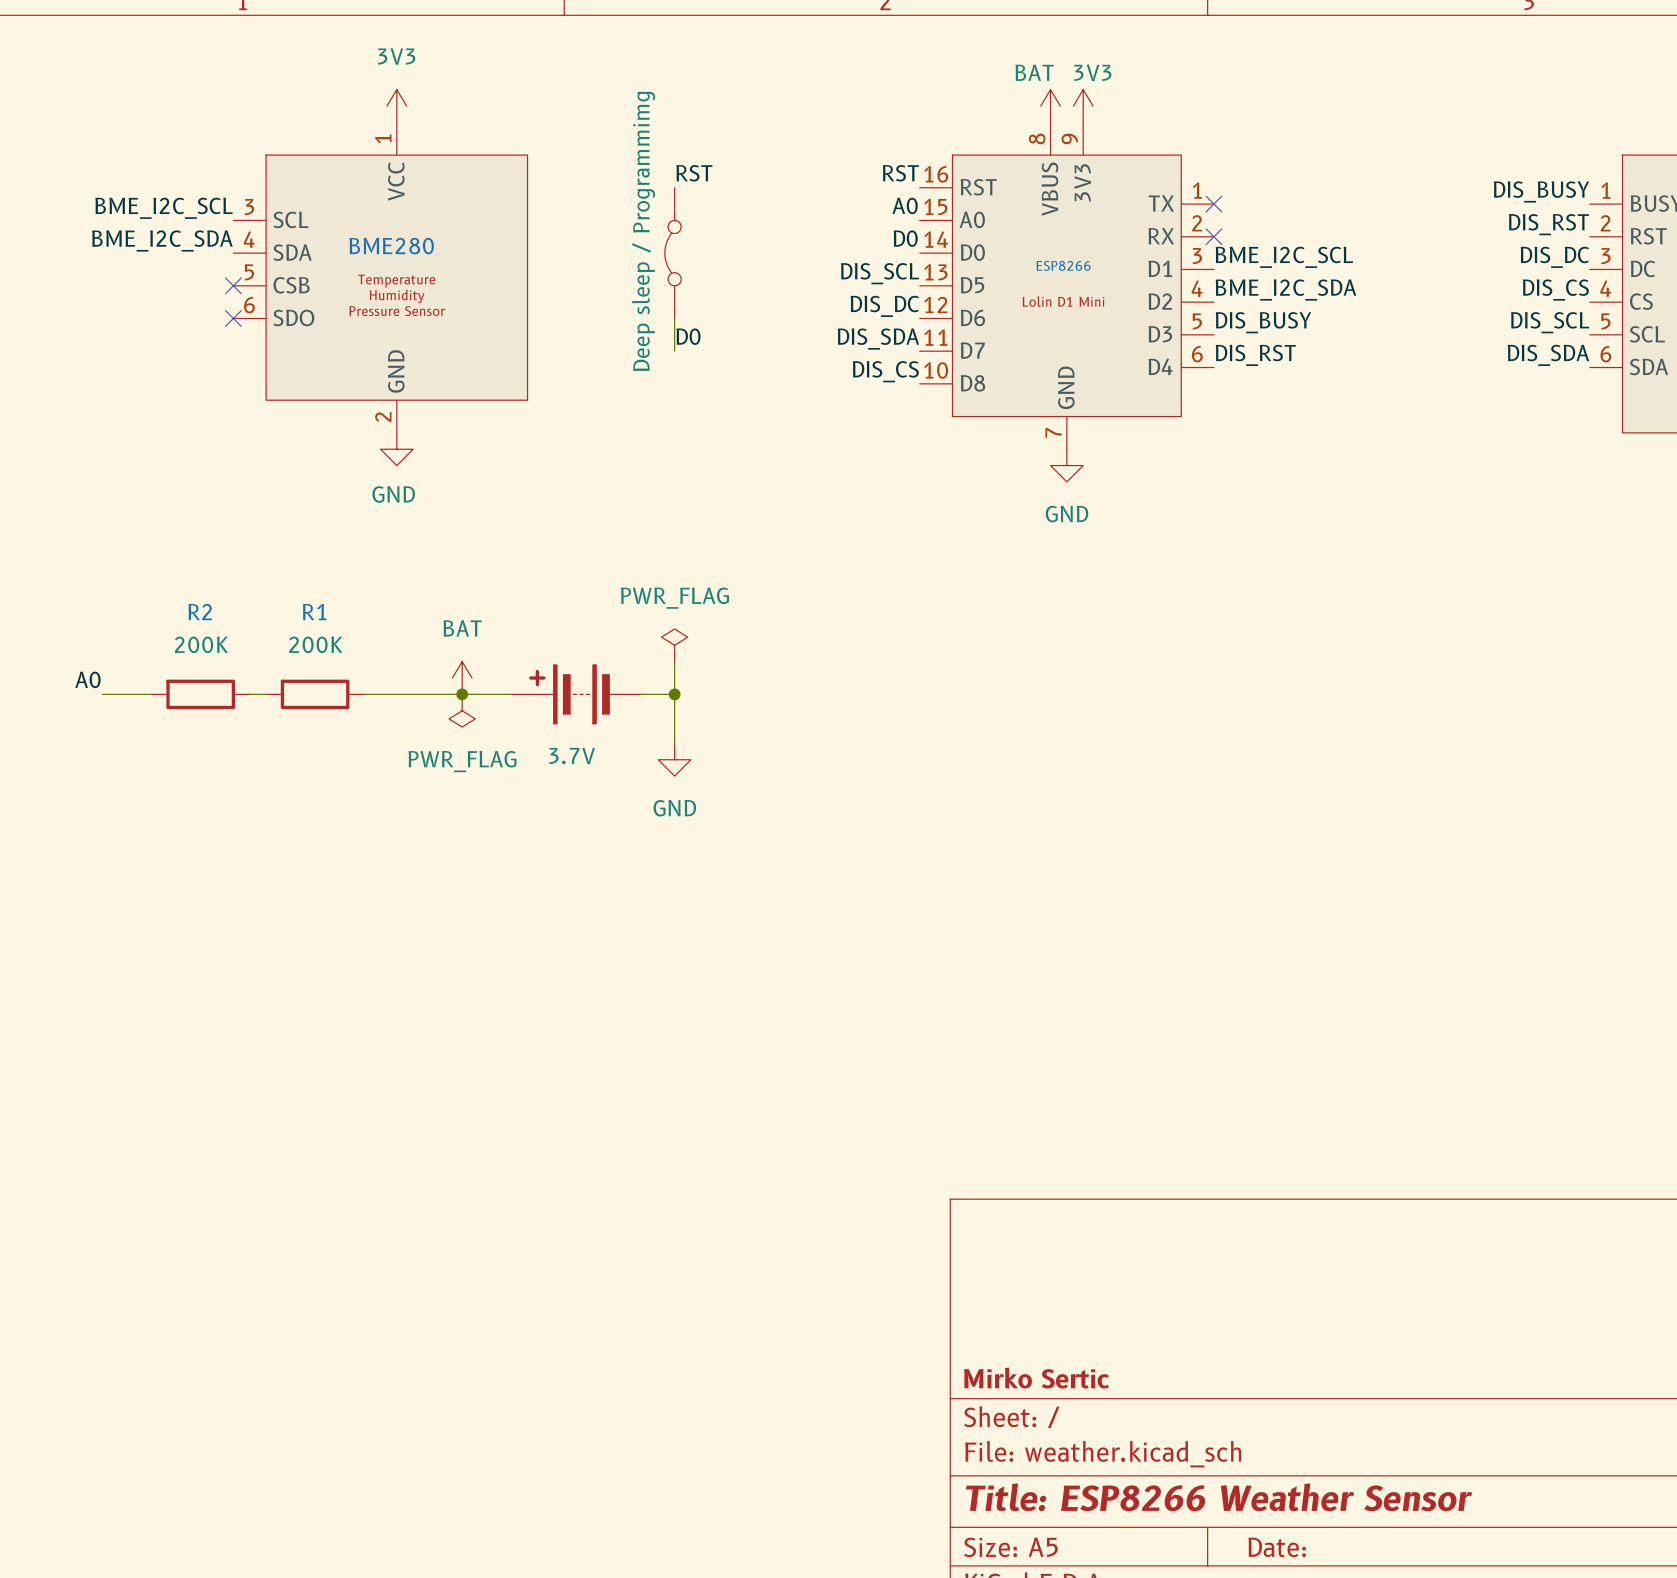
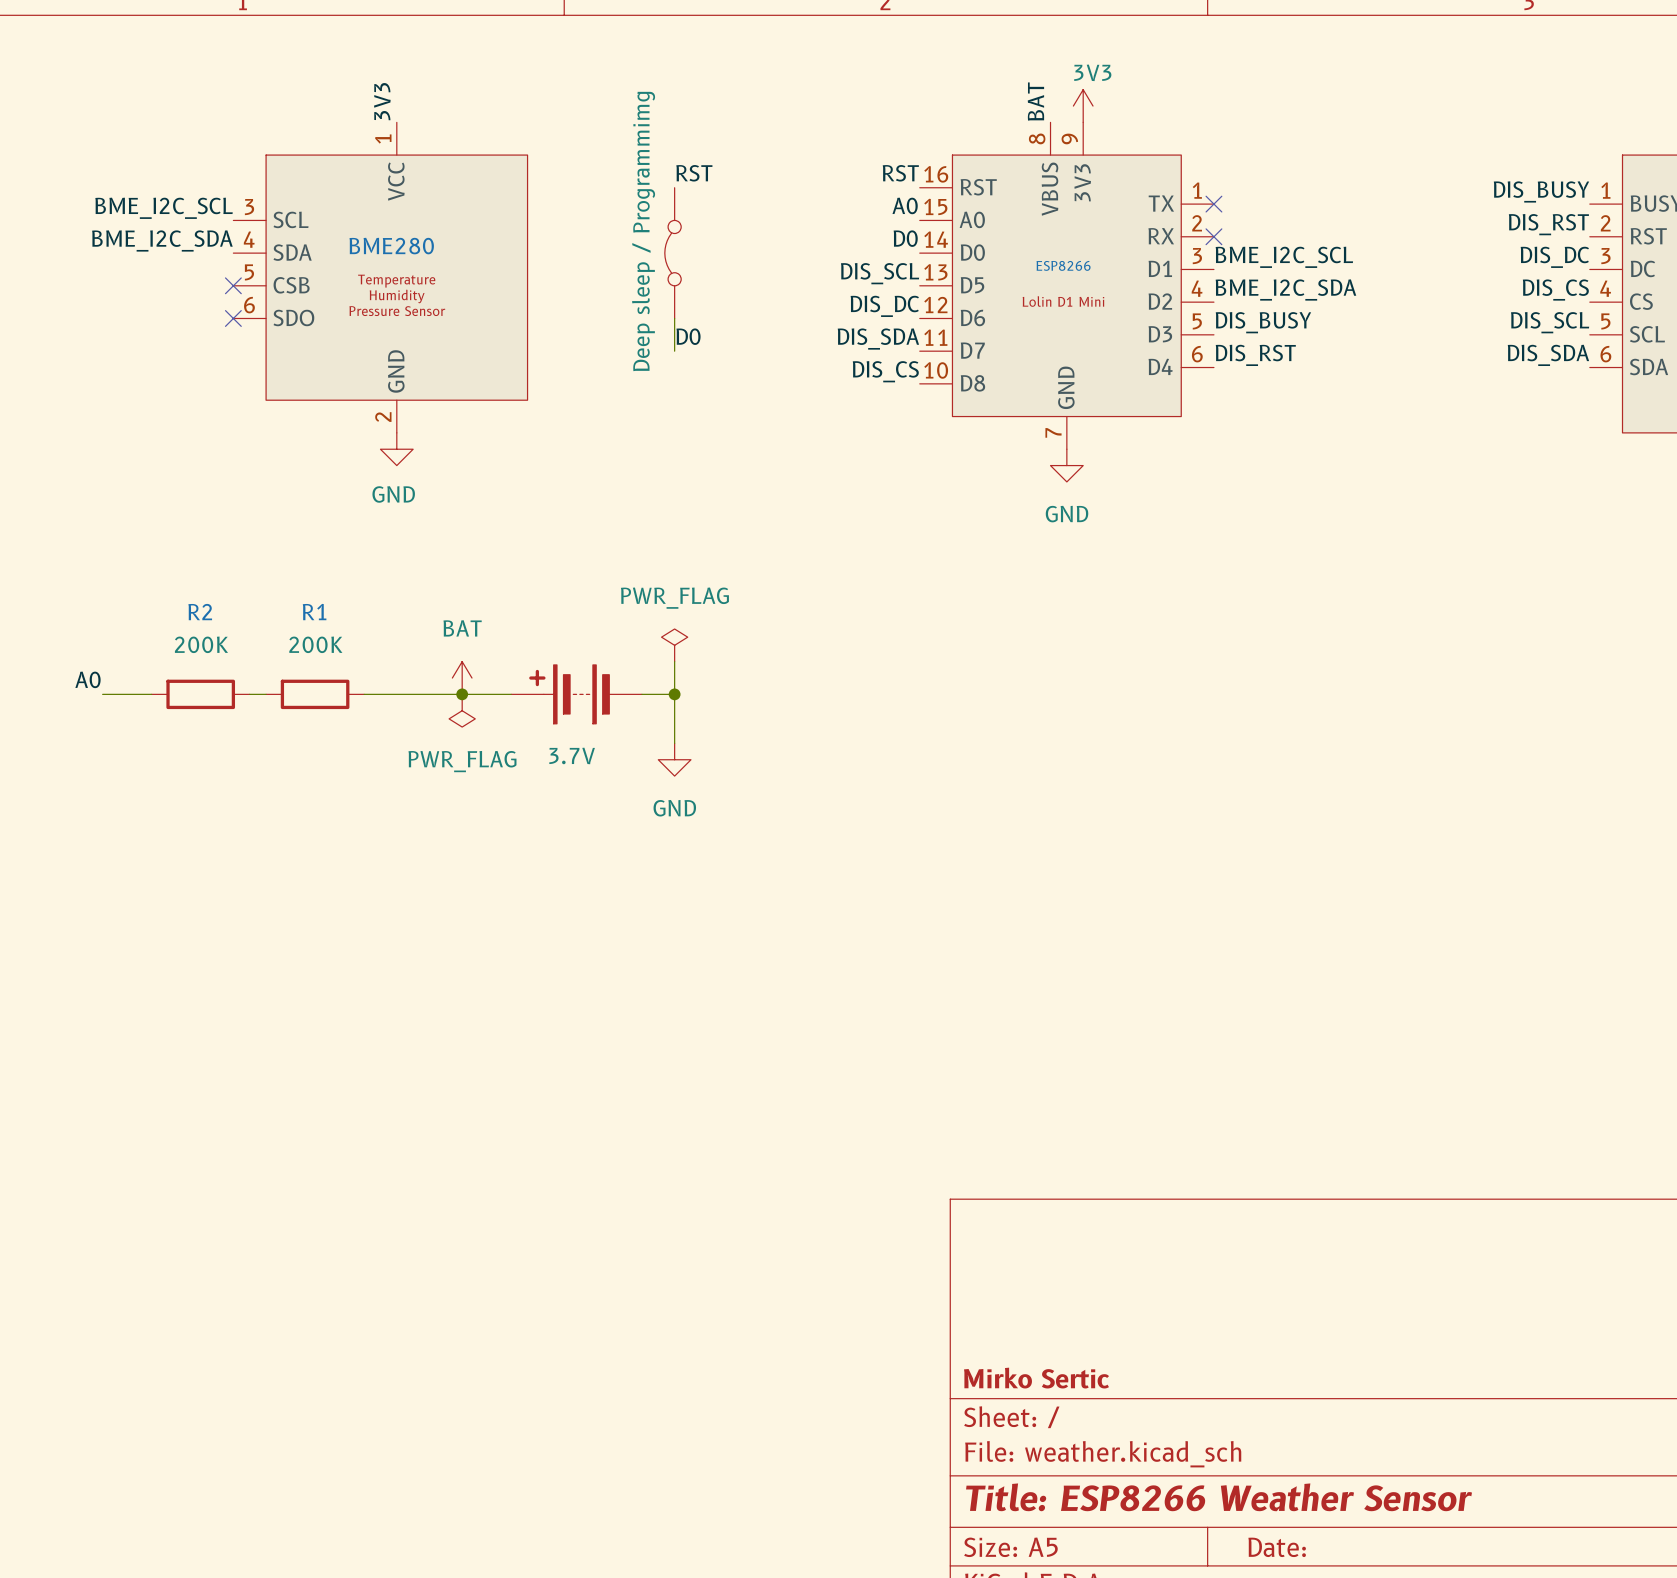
label: none -> 3V3 (382, 101)
label: none -> BAT (1035, 101)
power symbol: 3V3 (396, 106) -> none
power symbol: BAT (1050, 106) -> none

